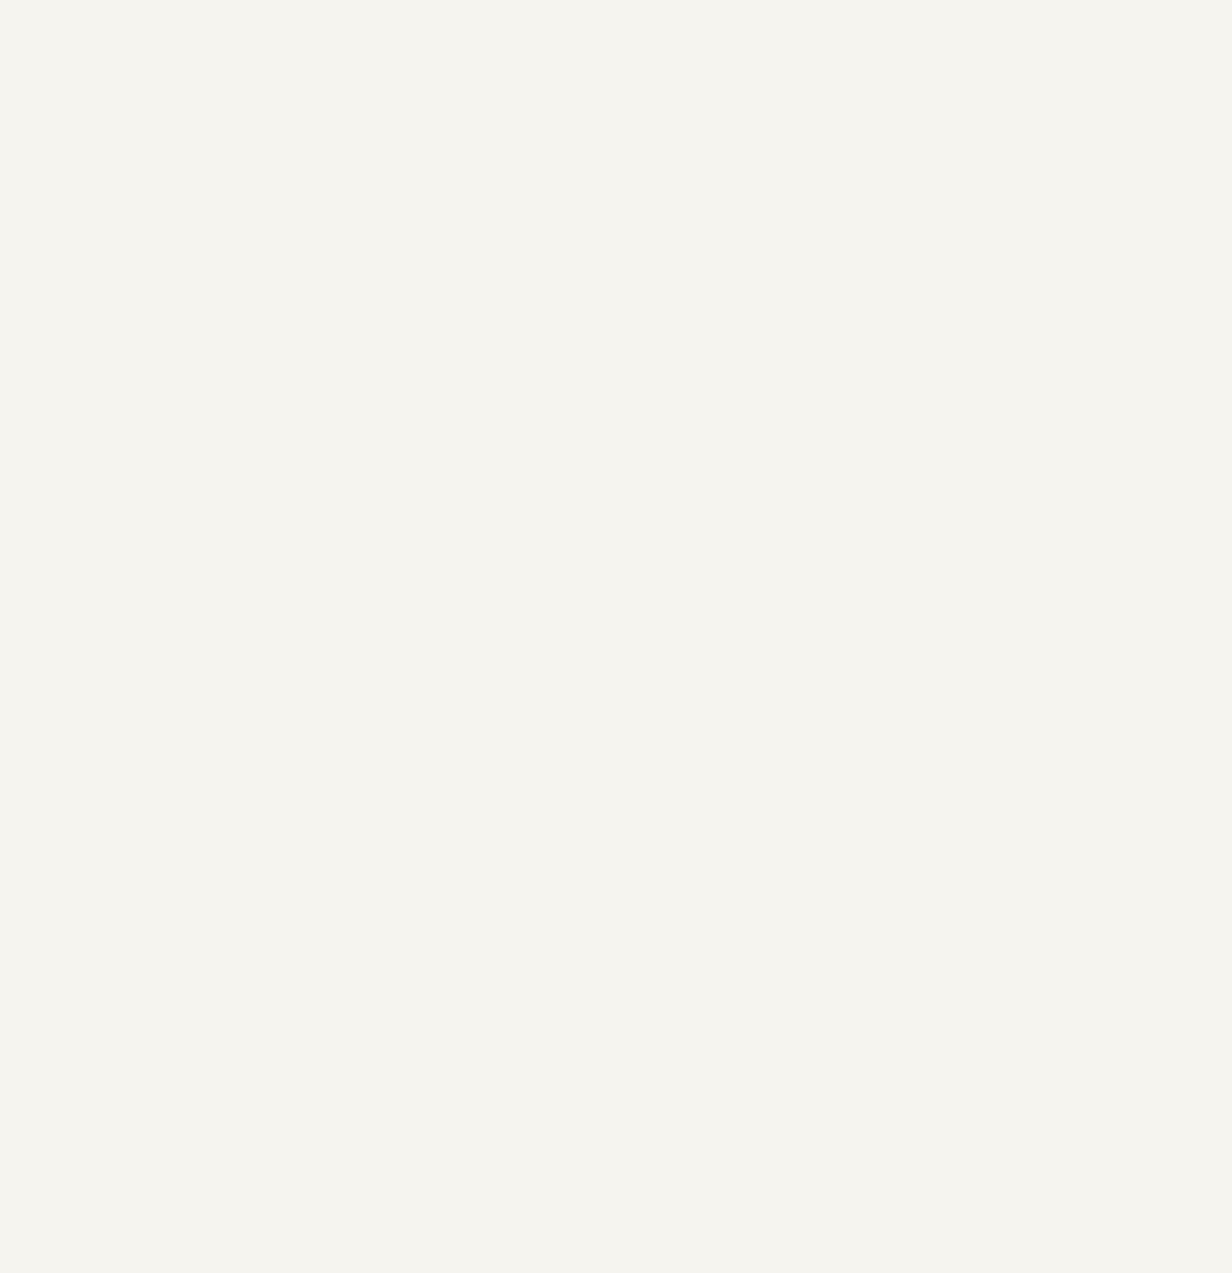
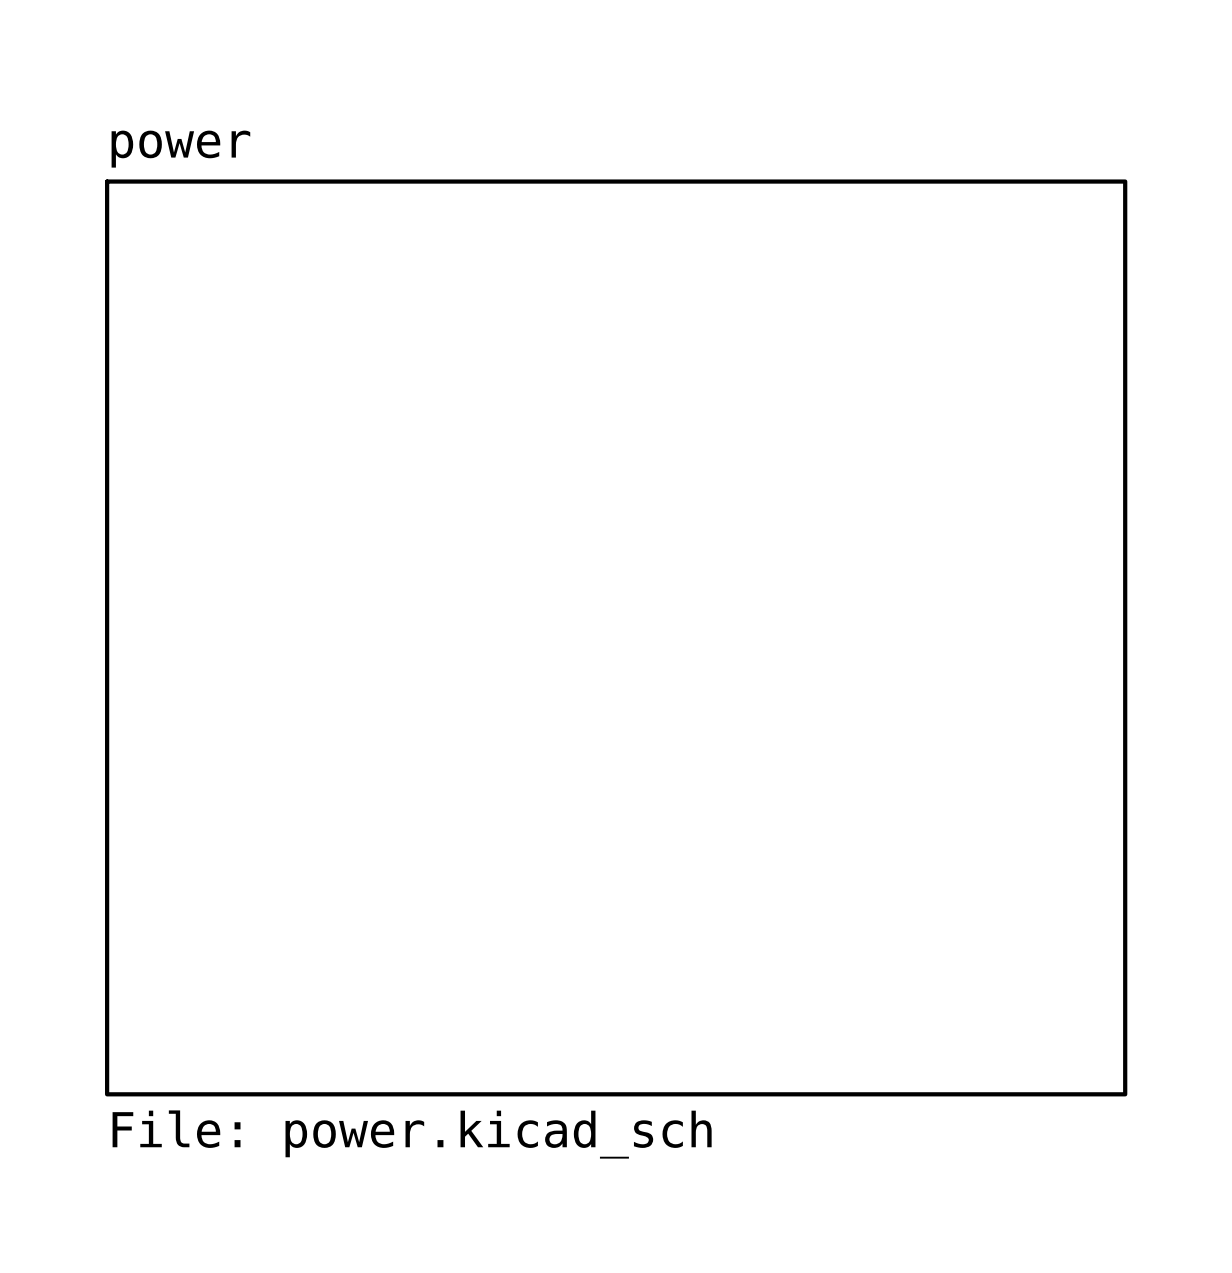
sheet power: none -> File: power.kicad_sch (616, 637)

